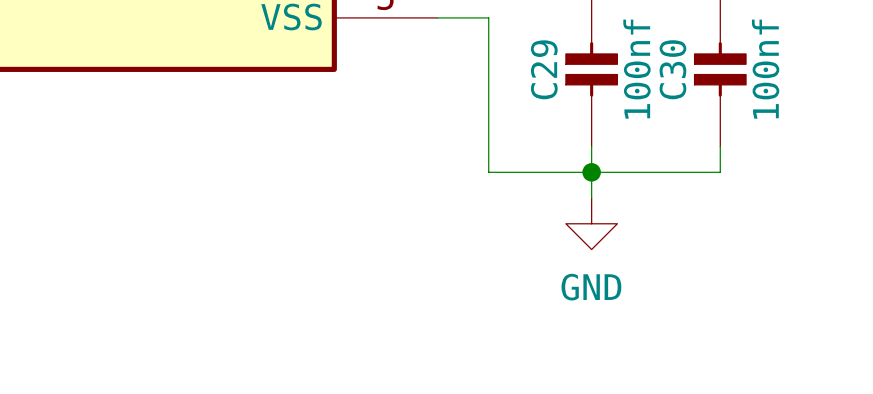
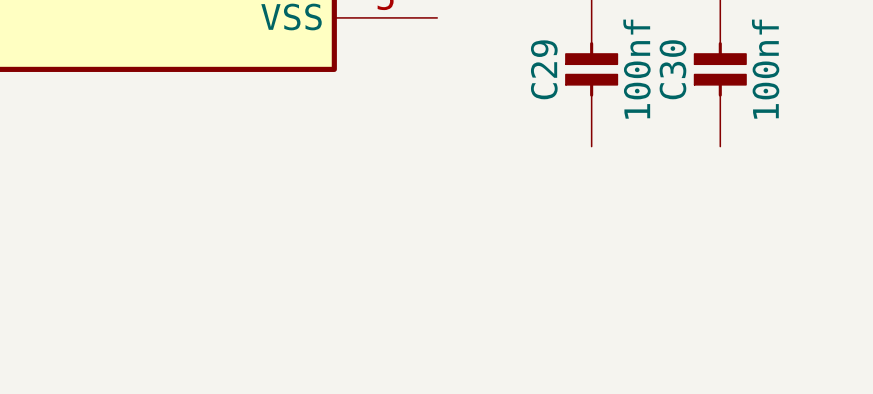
wire: (437, 17) (488, 17) (488, 172) (720, 172) (720, 146) -> none
wire: (591, 146) (591, 198) -> none
junction: (591, 172) -> none
power symbol: GND (591, 223) -> none

